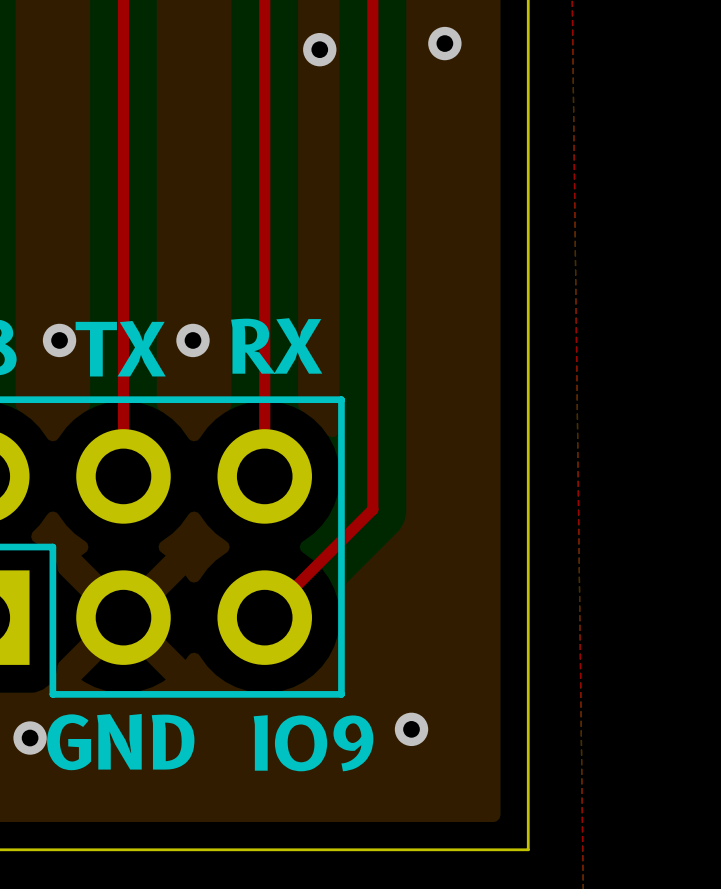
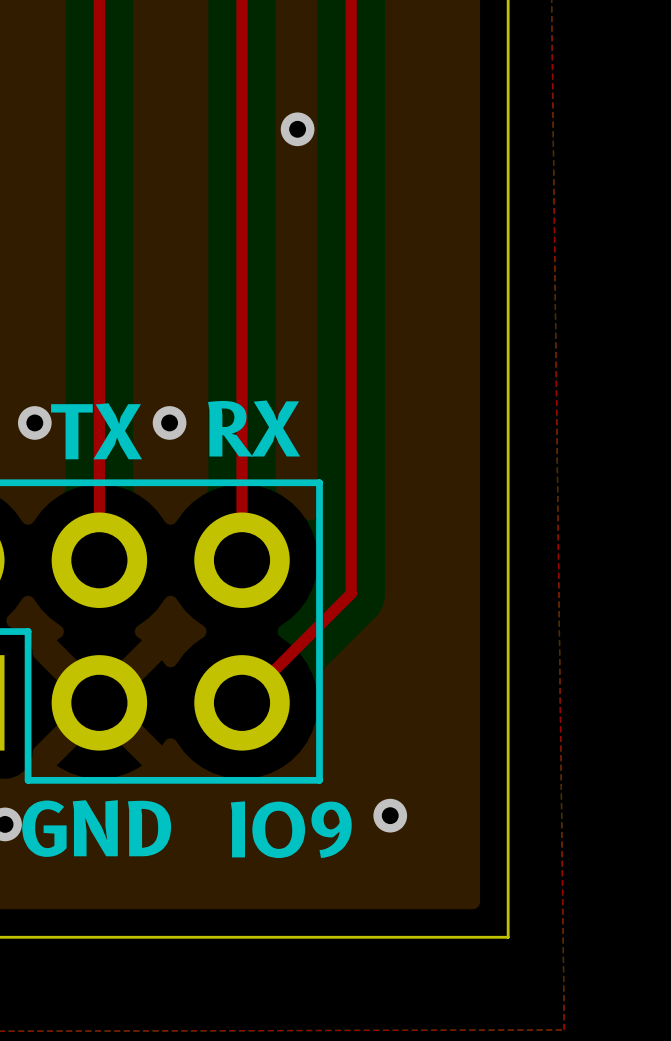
via: (444, 43) -> none

